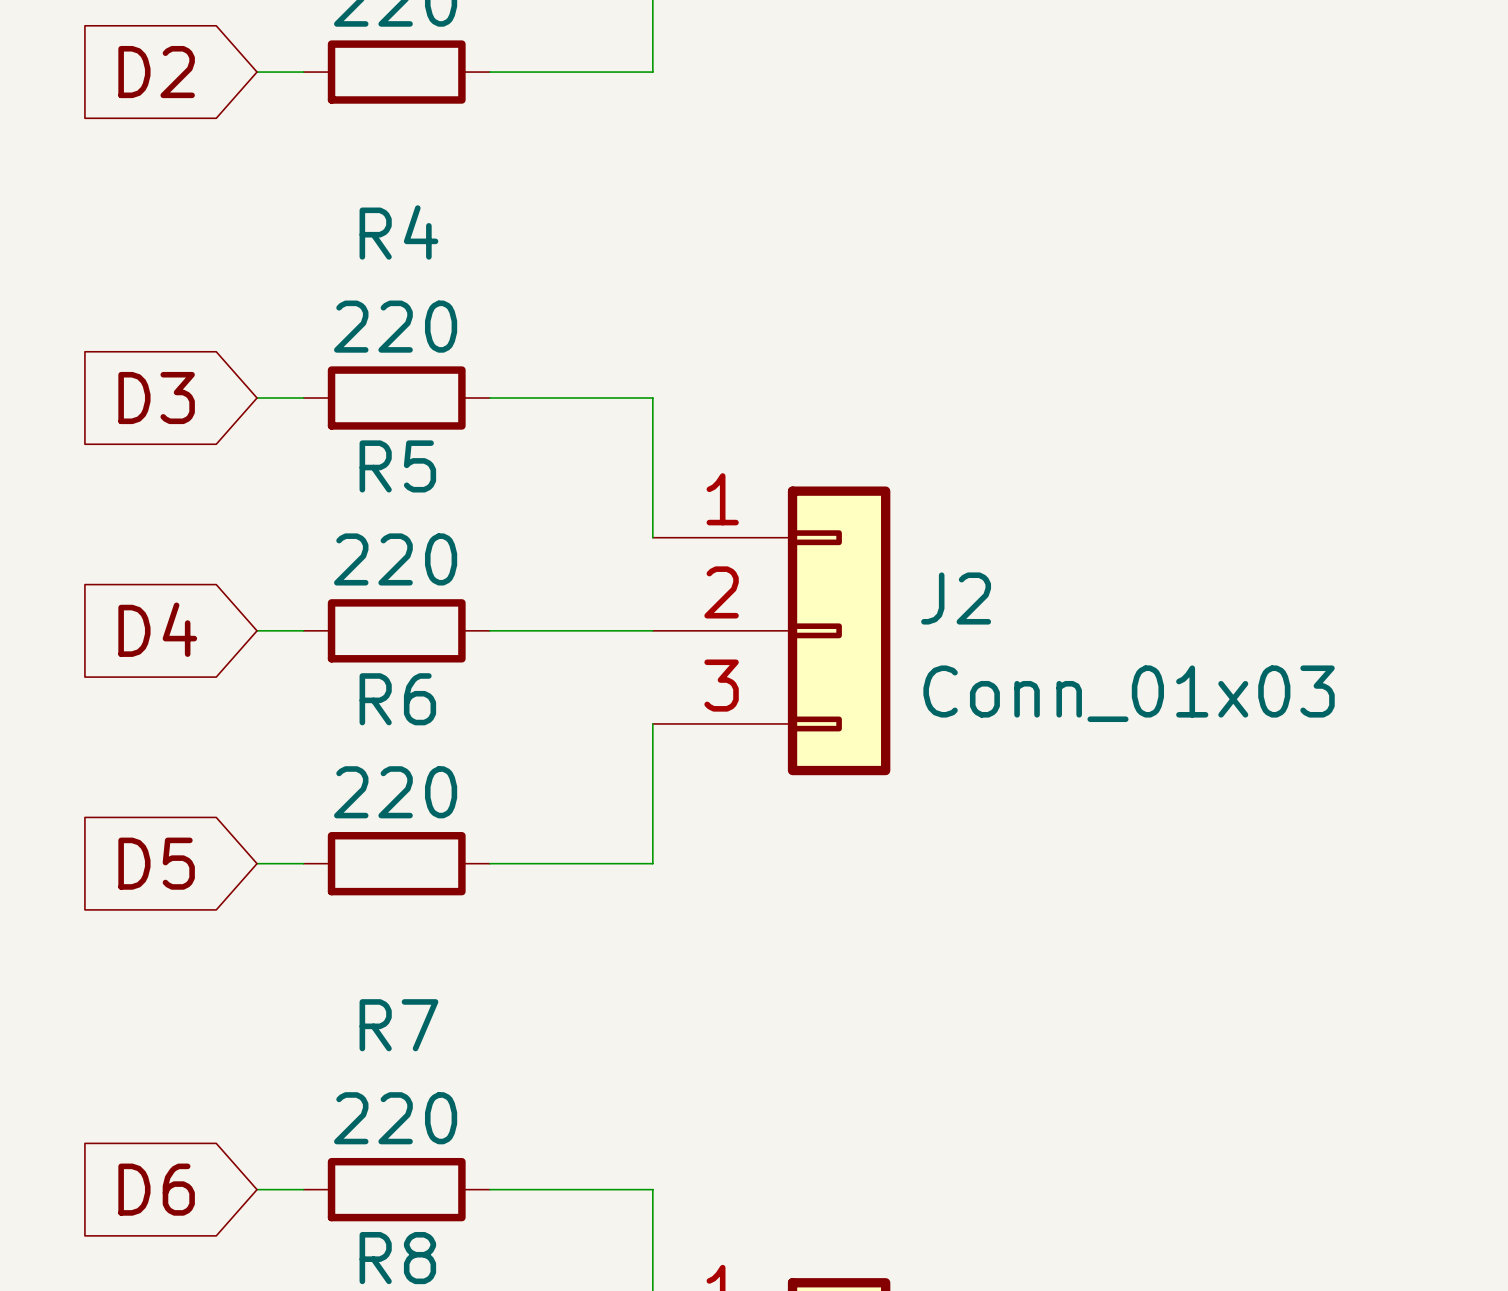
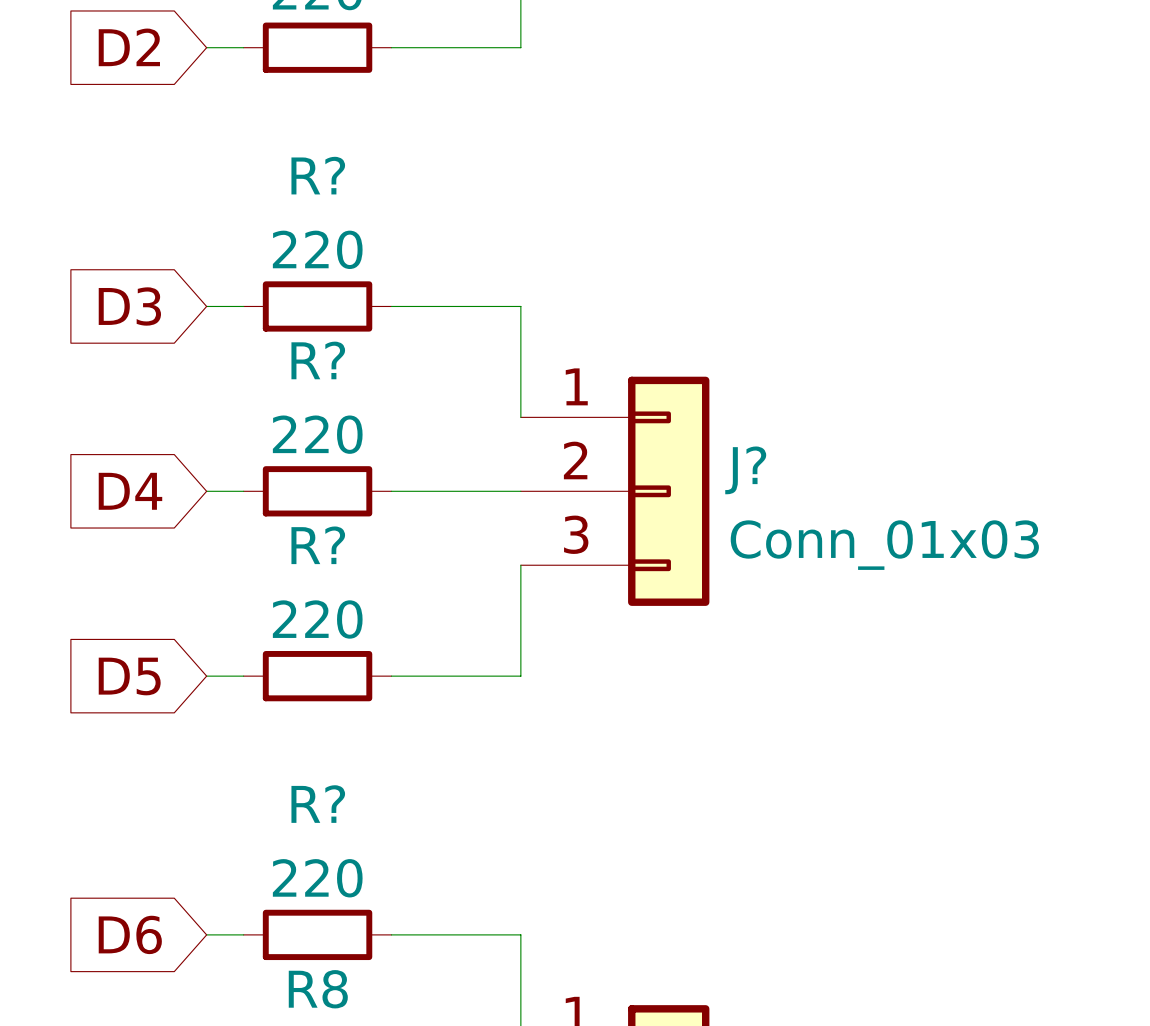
R4 name: R4 (398, 232) -> R? (318, 175)
R5 name: R5 (397, 466) -> R? (318, 360)
J2 name: J2 (956, 598) -> J? (745, 470)
R6 name: R6 (397, 699) -> R? (318, 545)
R7 name: R7 (398, 1025) -> R? (318, 804)

